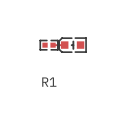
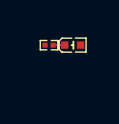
R1 name: R1 (49, 82) -> none

